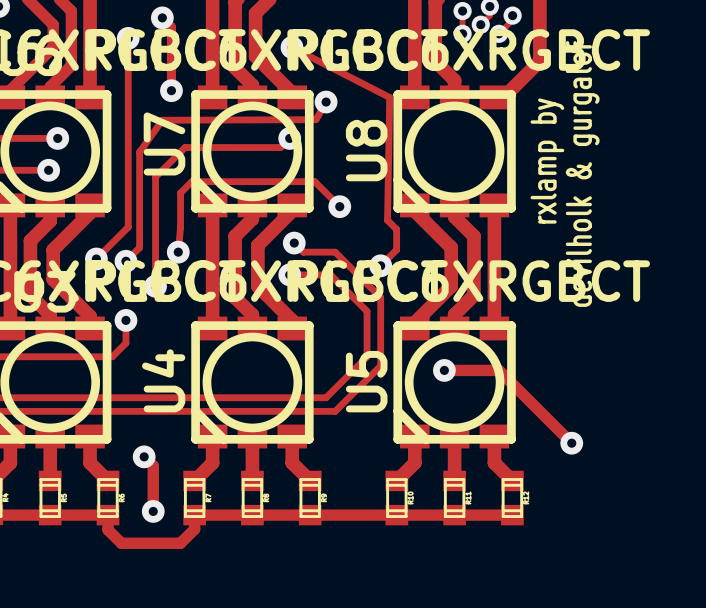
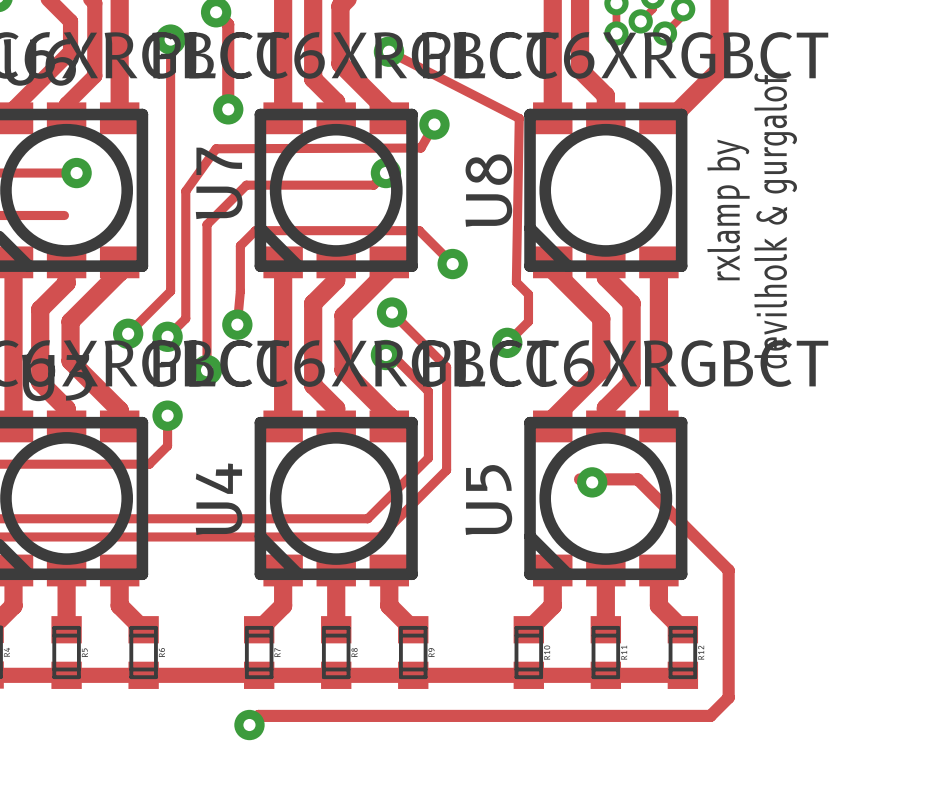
via: (48, 170) -> none
track: (303, 252) (335, 252) (380, 297) (380, 365) (335, 411) (285, 411) -> (404, 324) (446, 367) (446, 470) (379, 536)
track: (289, 274) (330, 274) (367, 311) (367, 356) (326, 397) (276, 397) -> (392, 355) (428, 391) (428, 458) (367, 518)
track: none -> (580, 479) (637, 479) (728, 570) (728, 697) (710, 715) (258, 715) (249, 725)
track: (444, 370) (498, 370) (571, 443) -> none
via: (571, 443) -> none
track: (144, 456) (153, 465) (153, 511) -> none
via: (144, 456) -> none
via: (153, 511) -> none
track: (108, 515) (108, 529) (121, 543) (180, 543) (194, 529) (194, 515) -> (143, 675) (259, 675)
via: none -> (249, 725)

